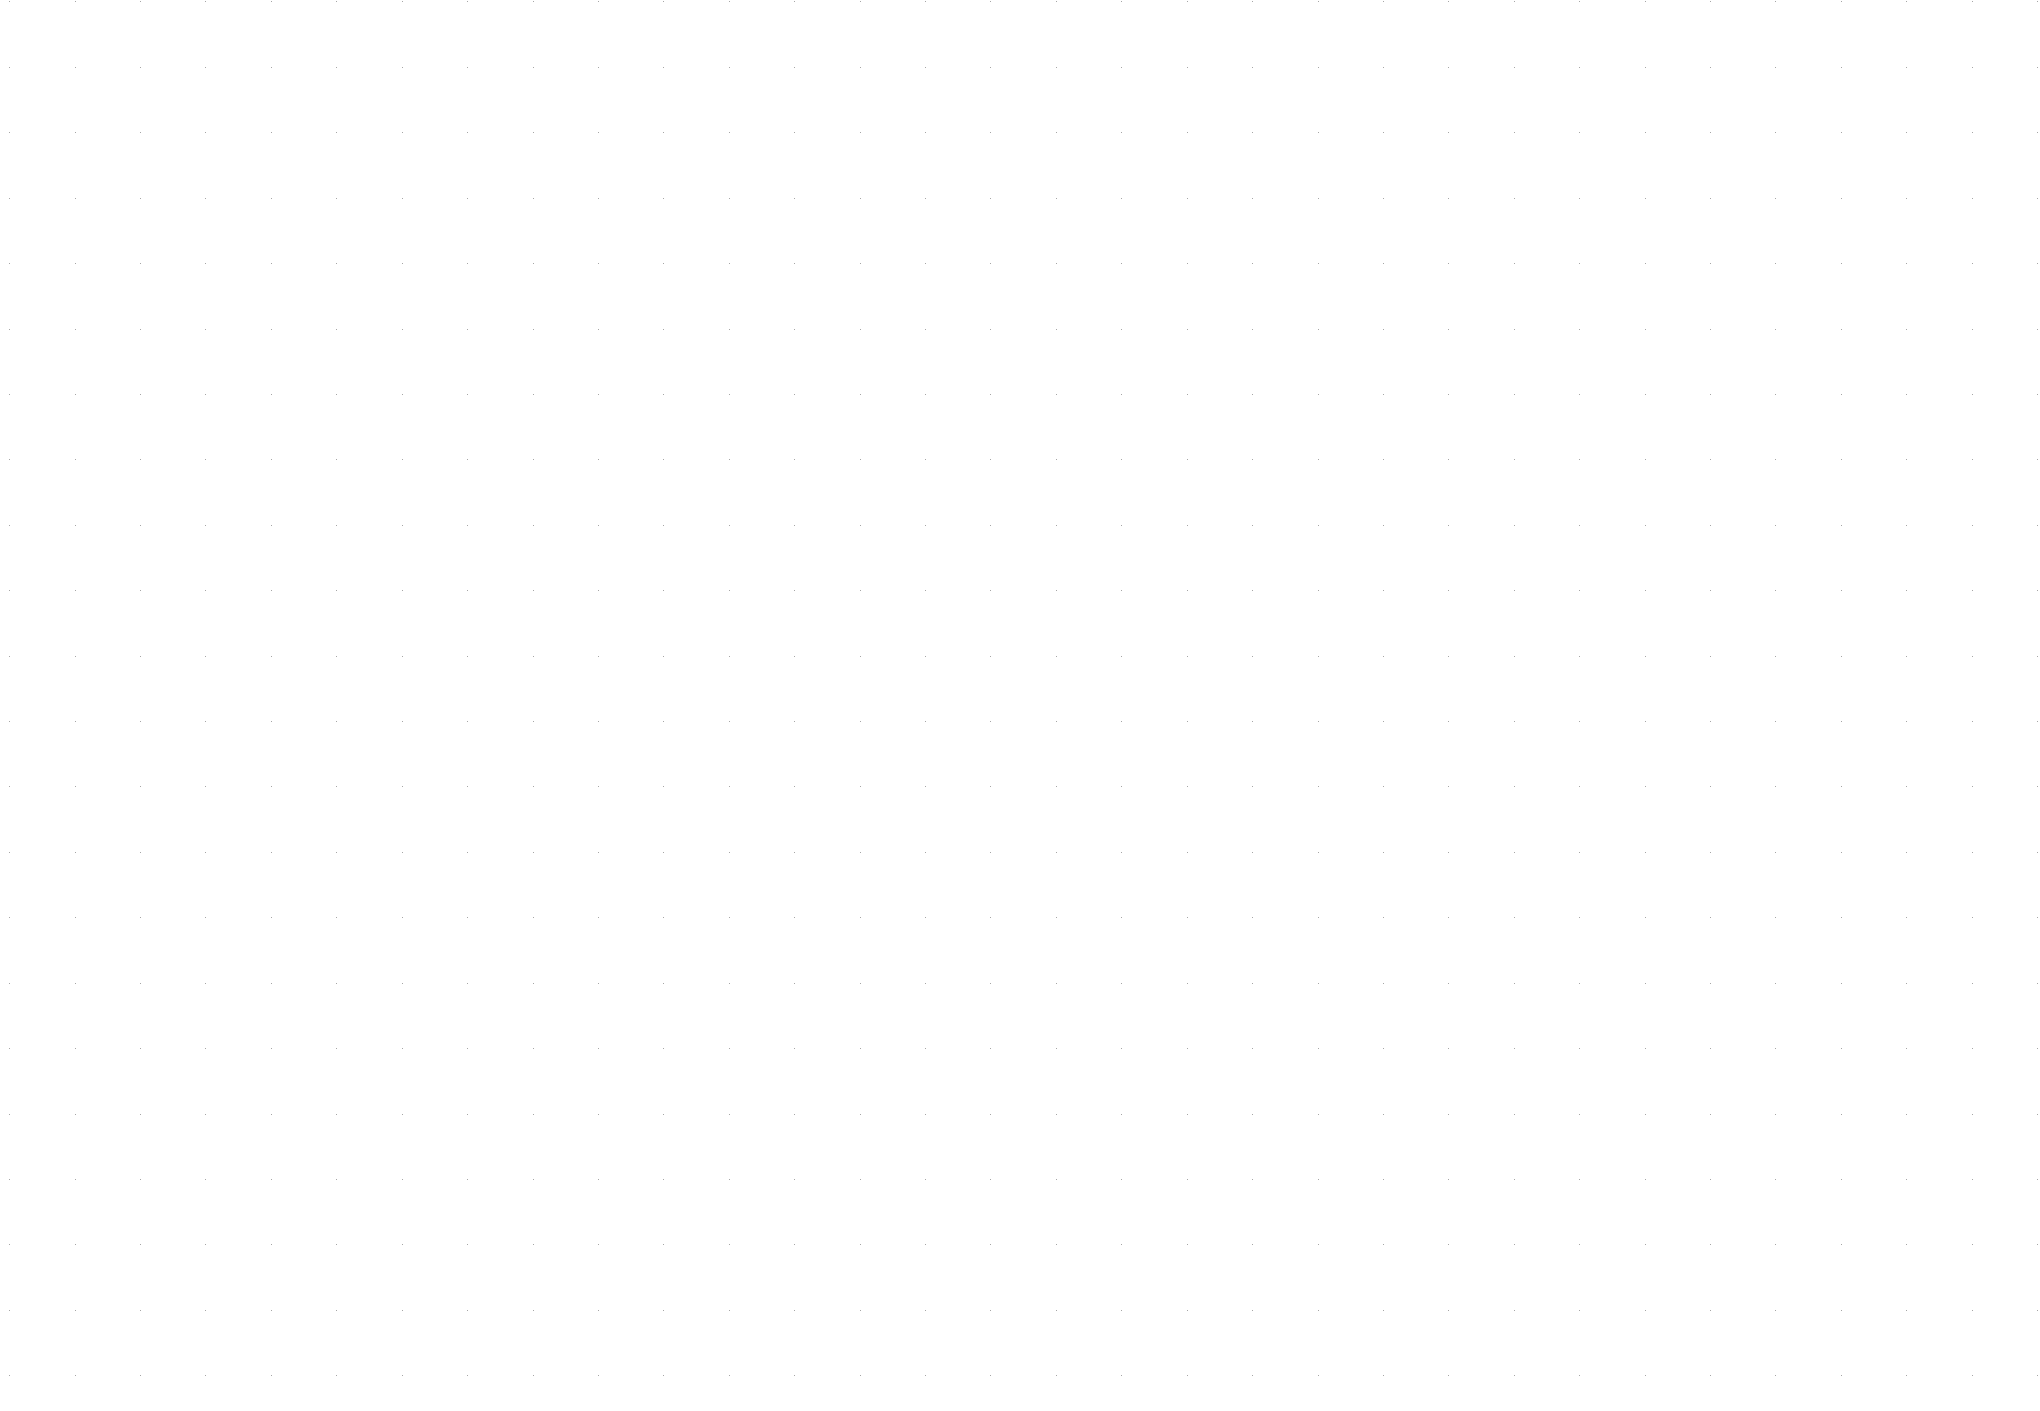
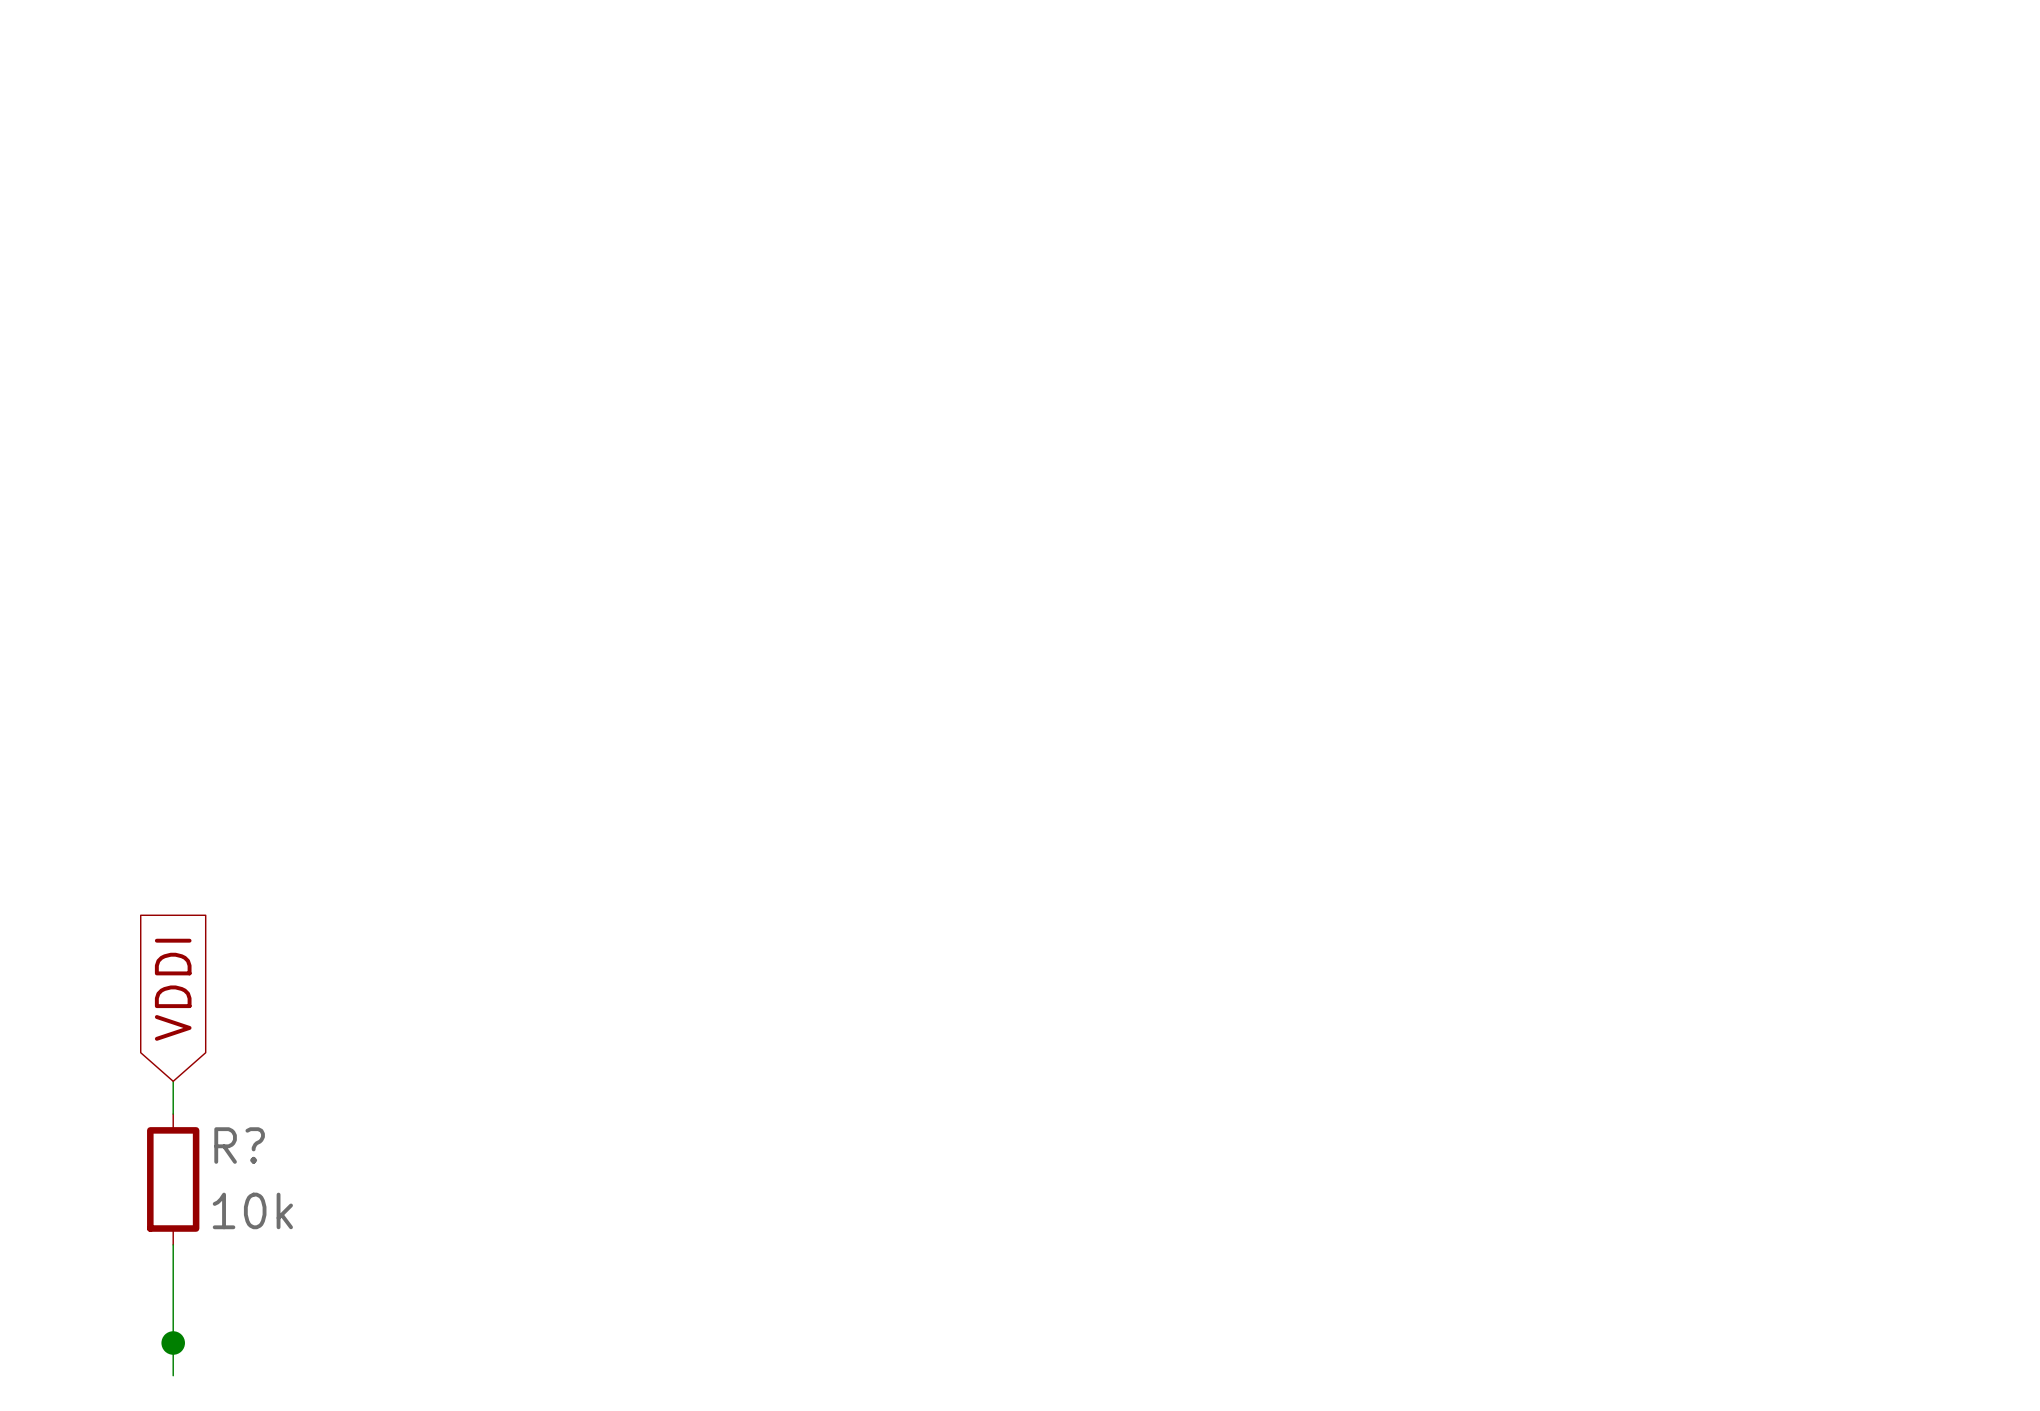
global label: none -> VDDI (173, 989)
wire: none -> (173, 1081) (173, 1114)
R?: none -> (173, 1179)
wire: none -> (173, 1244) (173, 1375)
junction: none -> (173, 1343)

